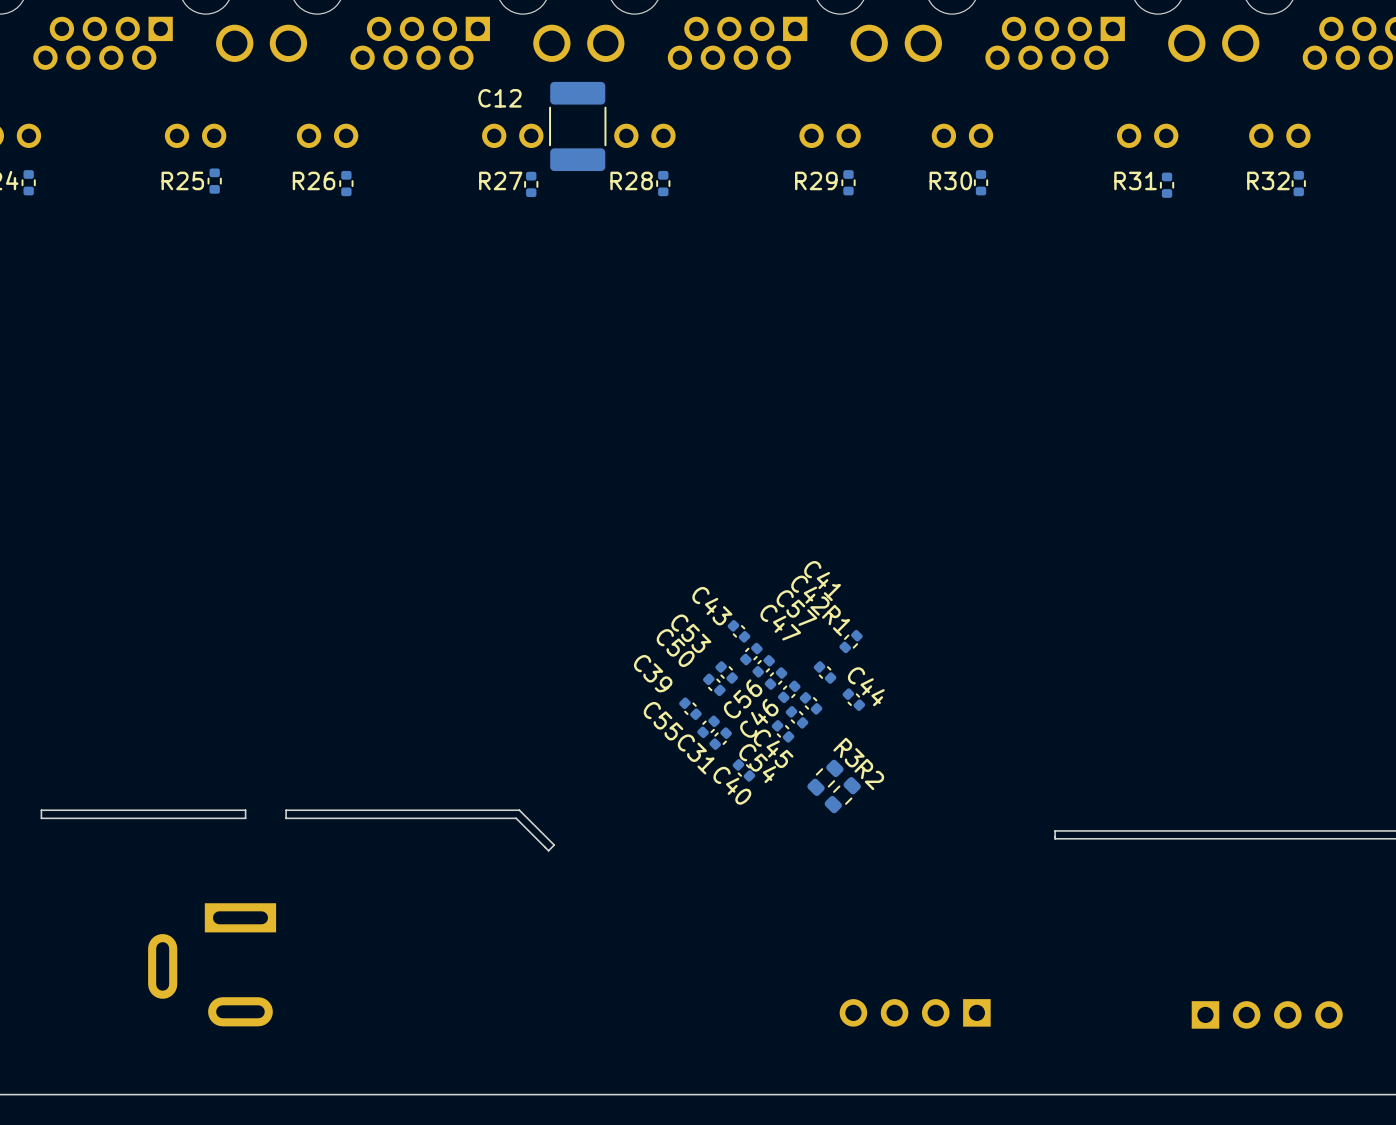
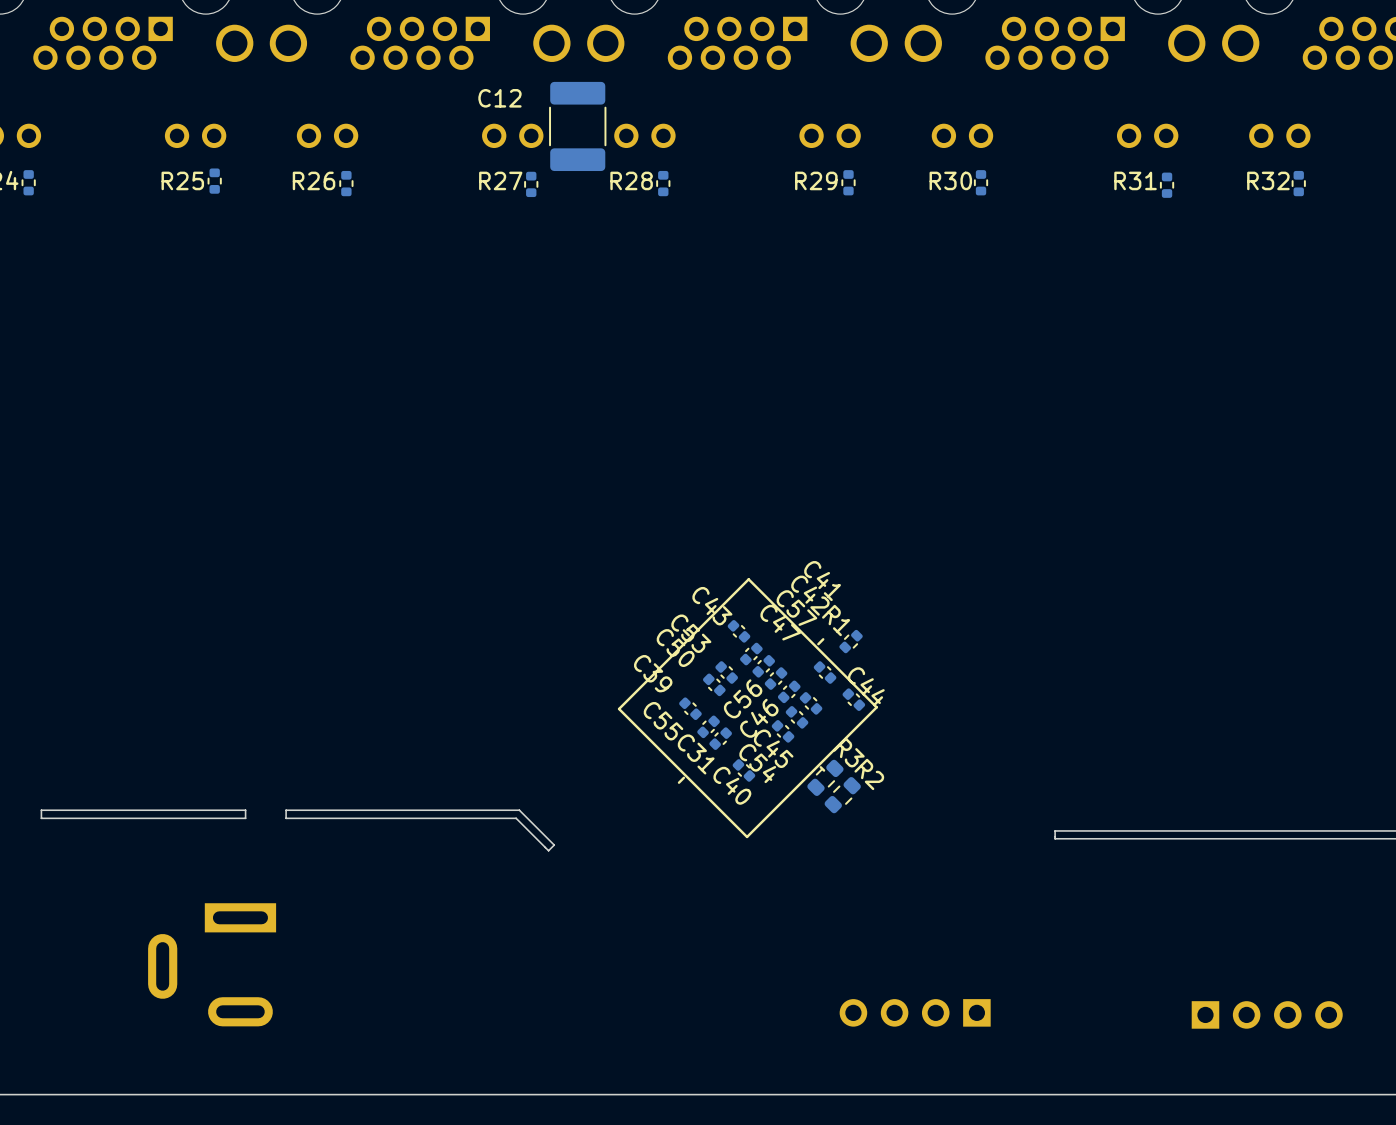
line: none -> (748, 579) (619, 708) (747, 836) (876, 707) (748, 579)
line: none -> (683, 630) (688, 635)
line: none -> (823, 639) (818, 644)
line: none -> (820, 767) (824, 770)
line: none -> (683, 777) (679, 782)

